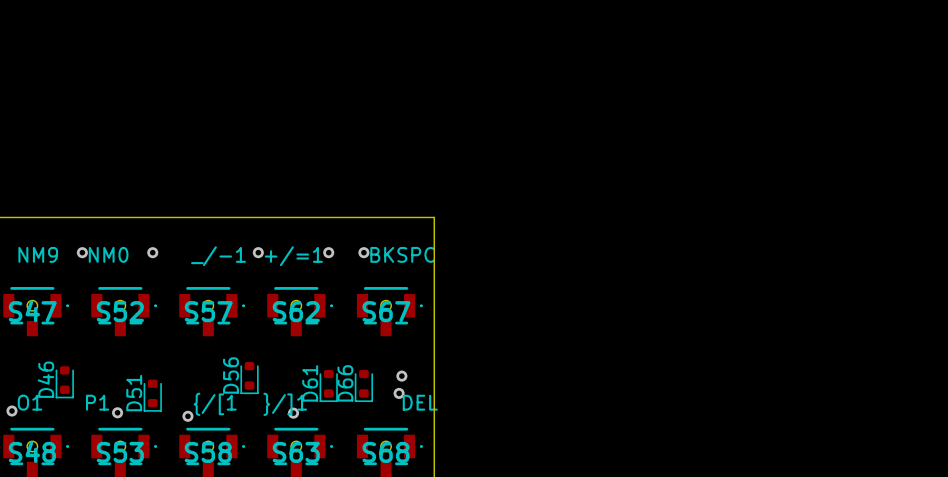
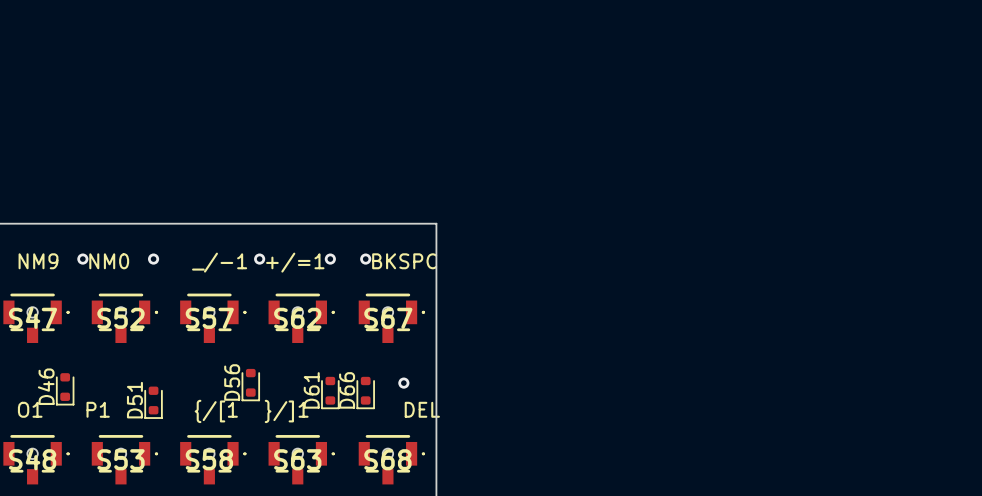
via: (399, 393) -> none
via: (11, 411) -> none
via: (117, 412) -> none
via: (293, 413) -> none
via: (187, 416) -> none

